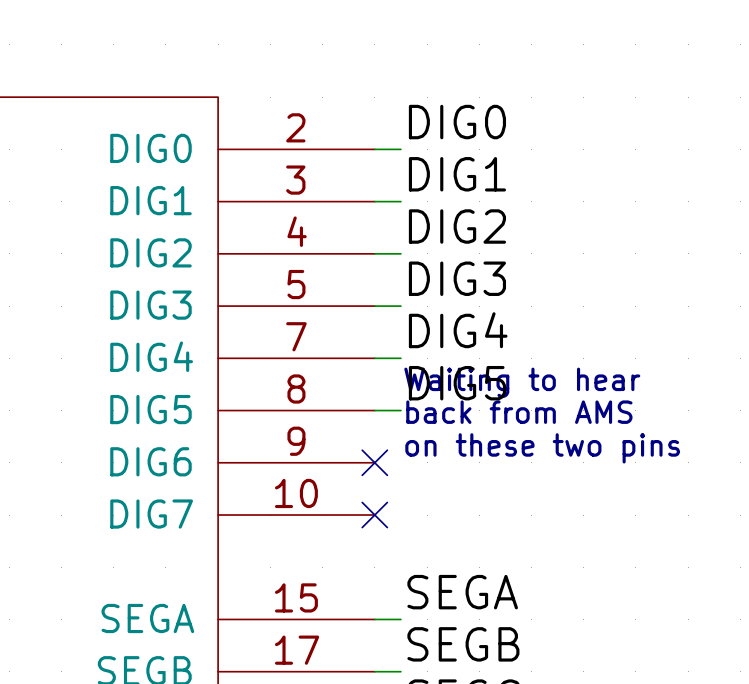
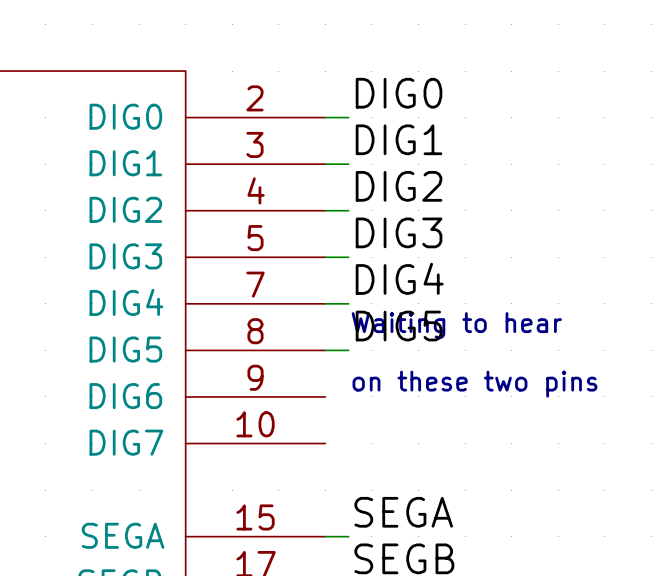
text: back from AMS (519, 412) -> none
no-connect mark: (374, 462) -> none
no-connect mark: (374, 515) -> none

